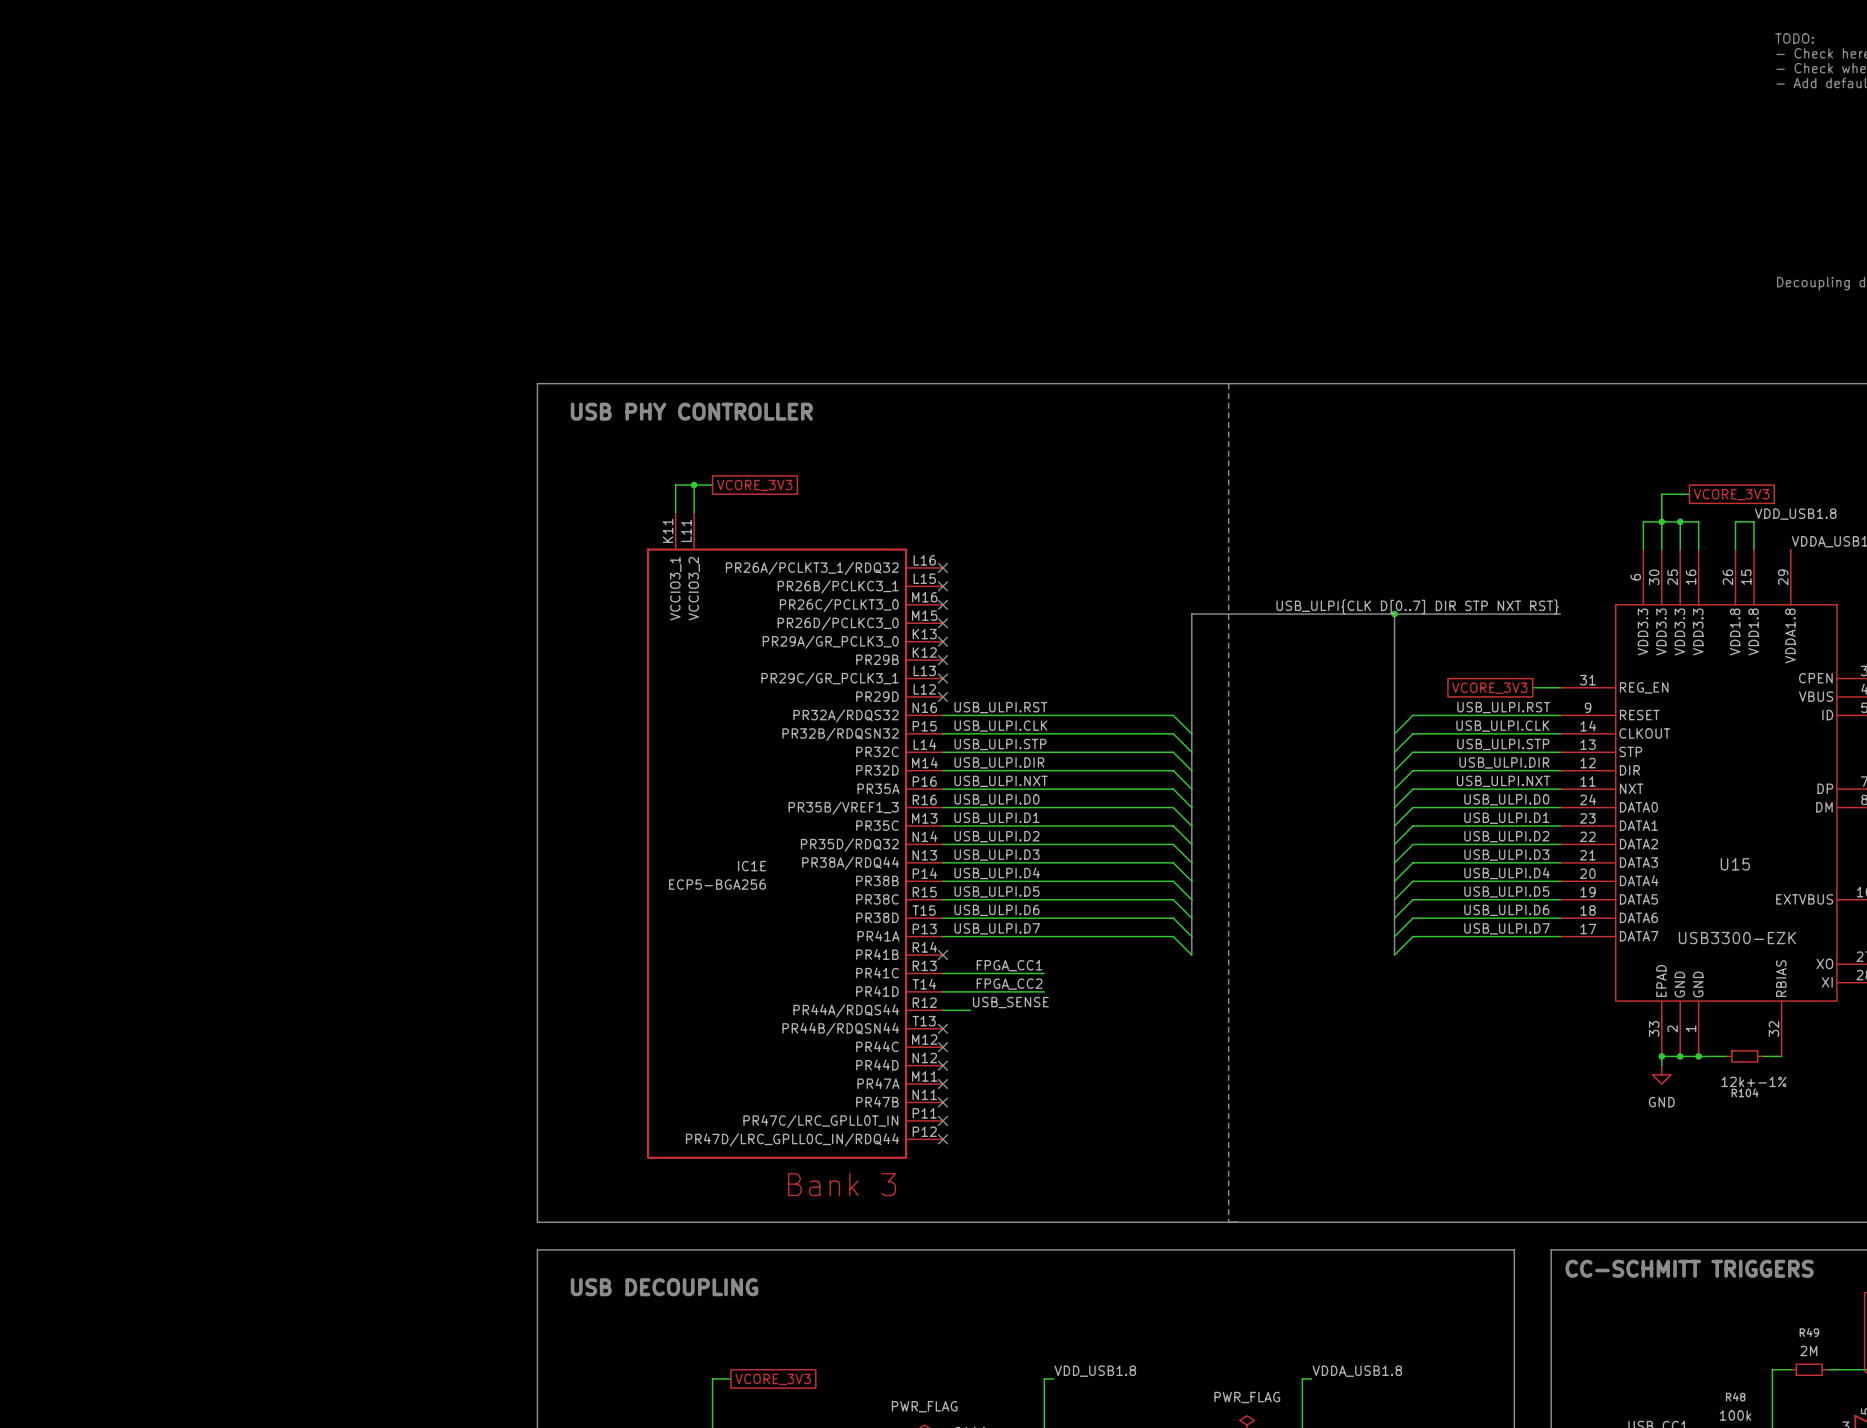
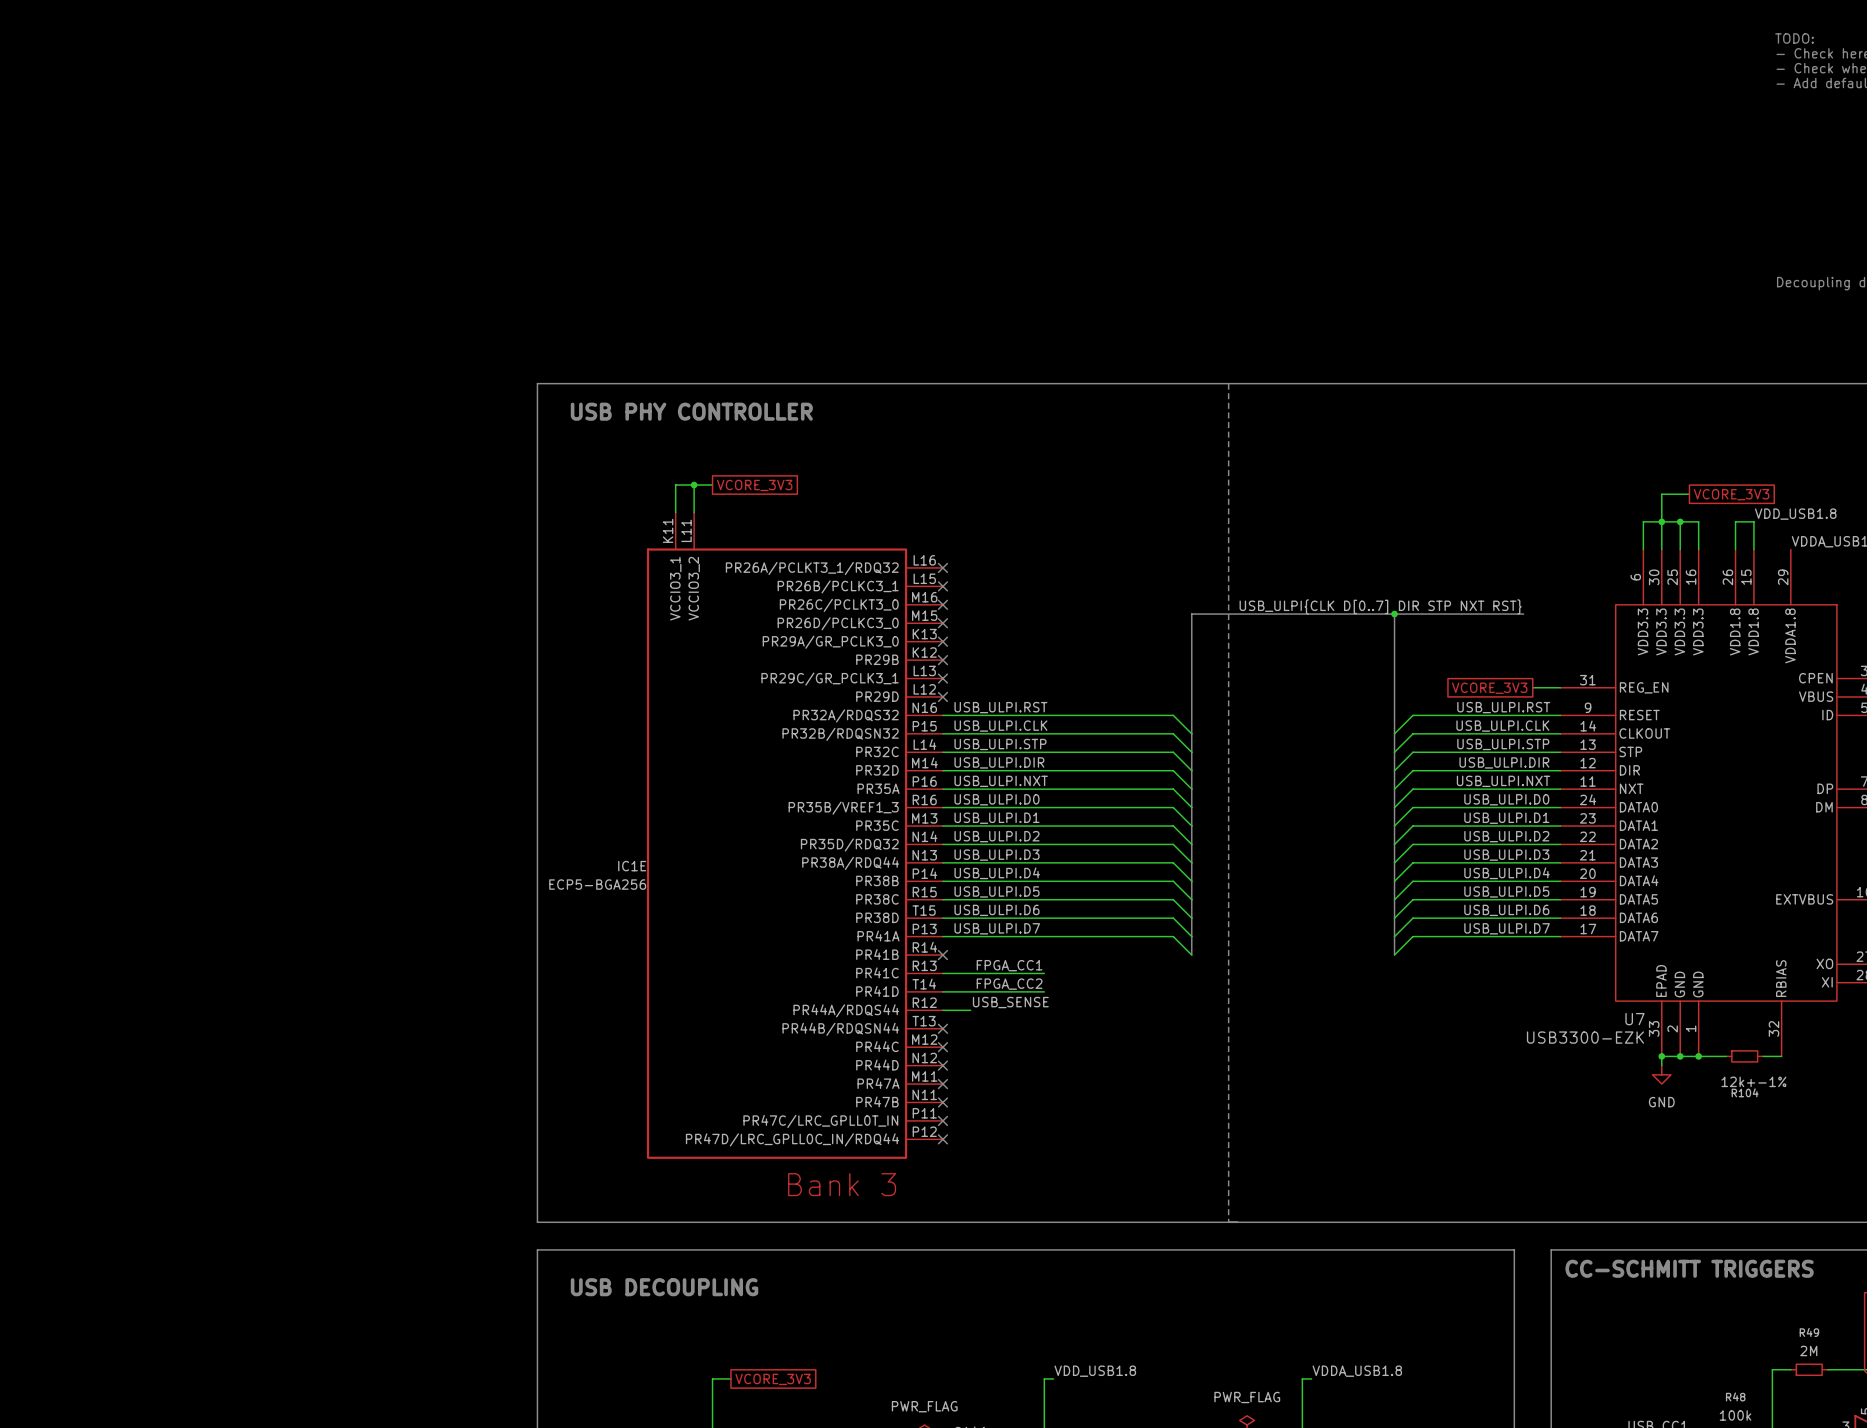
label position: USB_ULPI{CLK D[0..7] DIR STP NXT RST} (1417, 606) -> USB_ULPI{CLK D[0..7] DIR STP NXT RST} (1380, 606)
bus: (1523, 614) (1560, 614) -> none
U15 name: U15 (1735, 864) -> U7 (1634, 1019)
IC1E name position: IC1E (751, 866) -> IC1E (632, 866)
IC1E value position: ECP5-BGA256 (717, 884) -> ECP5-BGA256 (597, 884)
U15 value position: USB3300-EZK (1737, 938) -> USB3300-EZK (1585, 1037)

